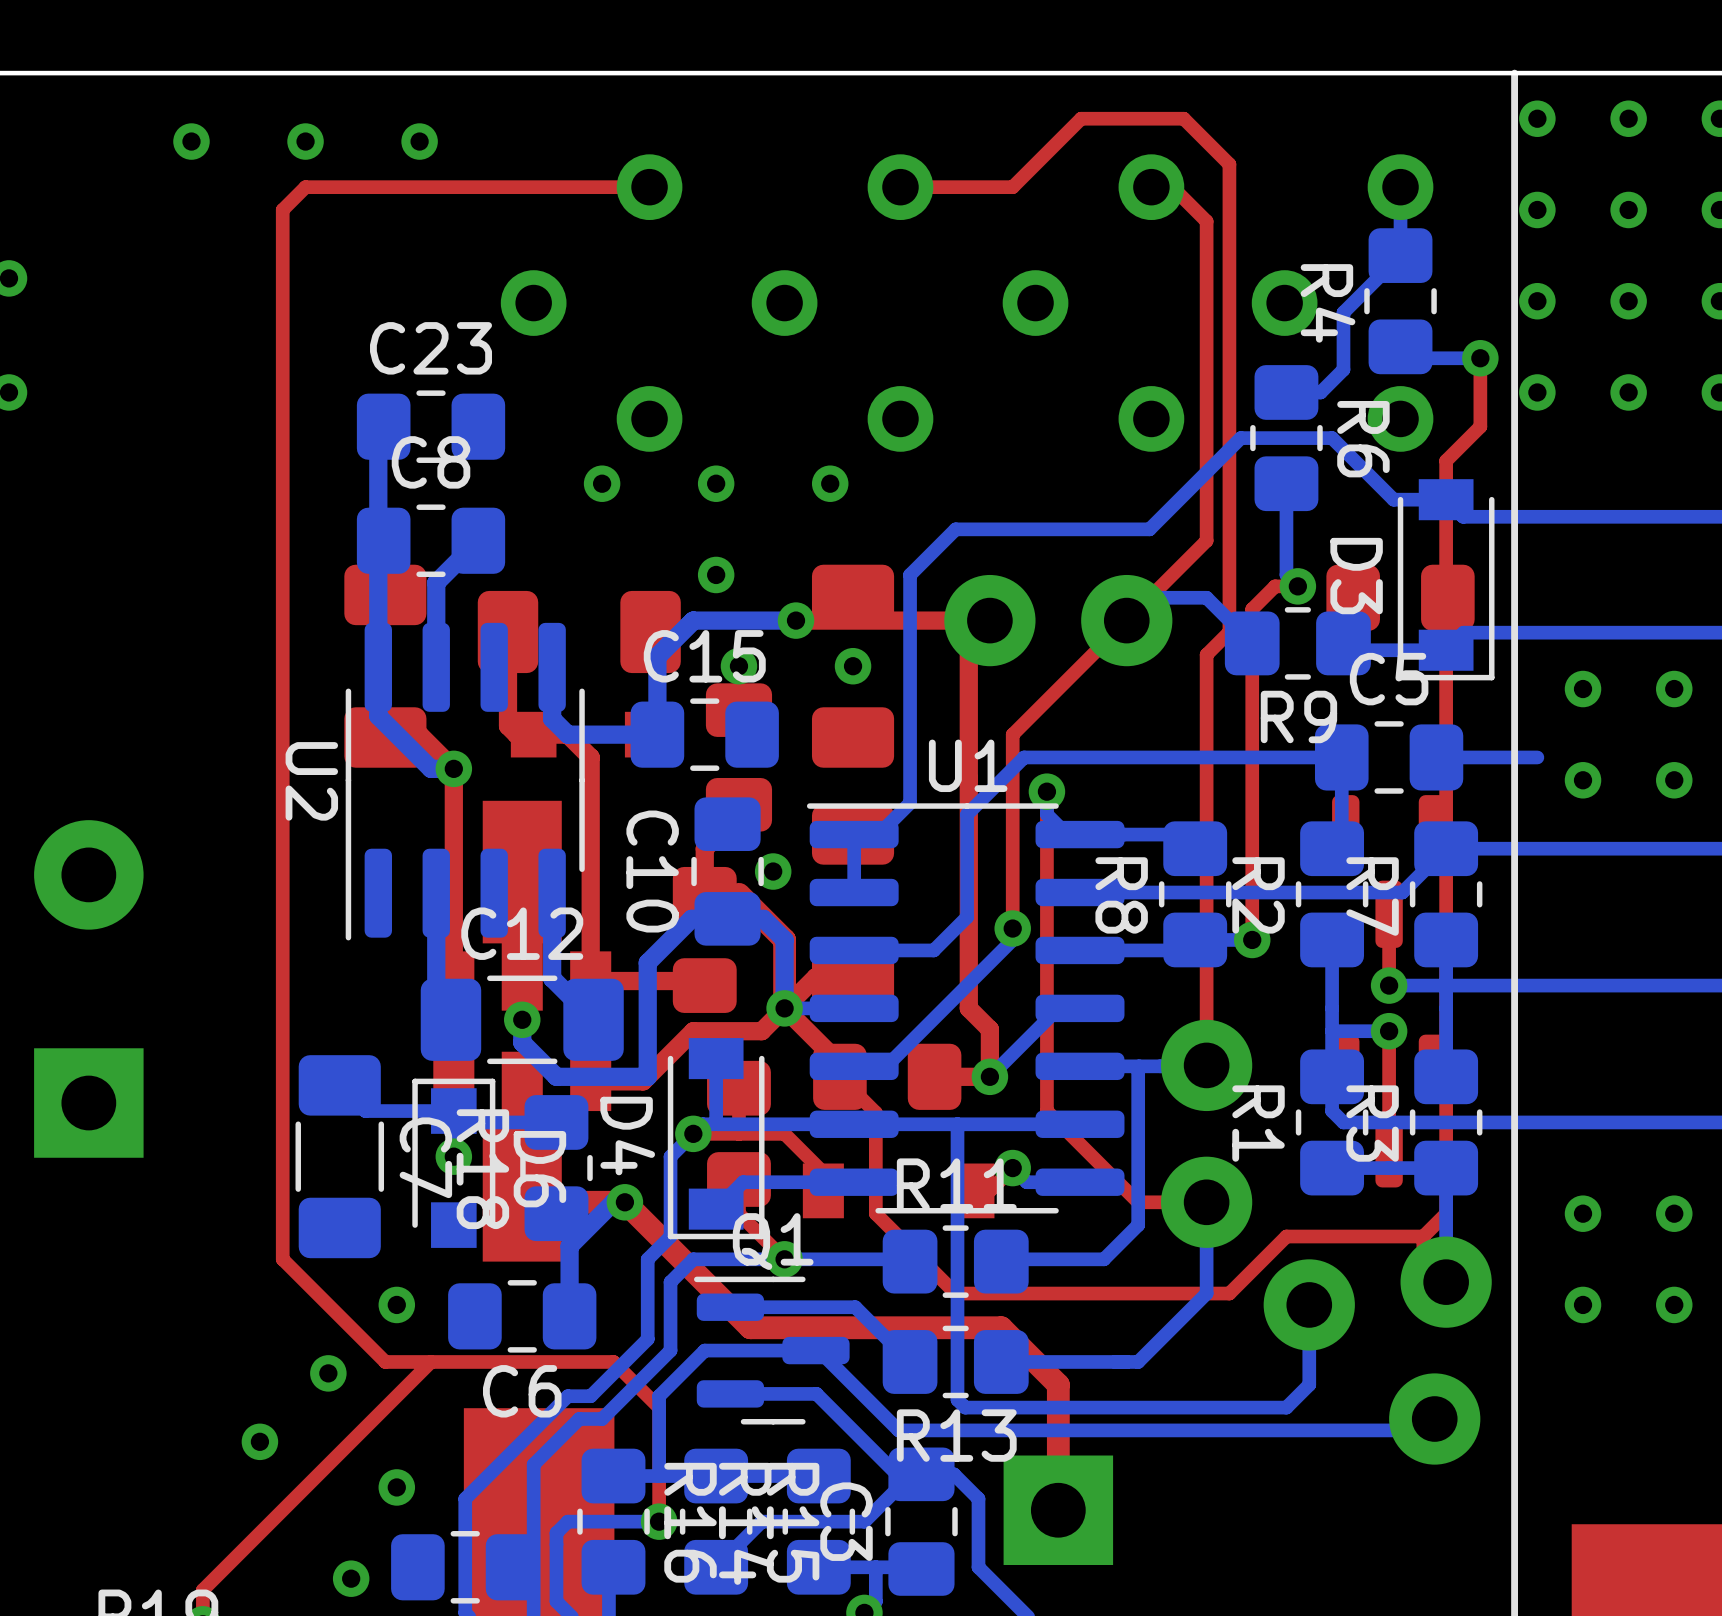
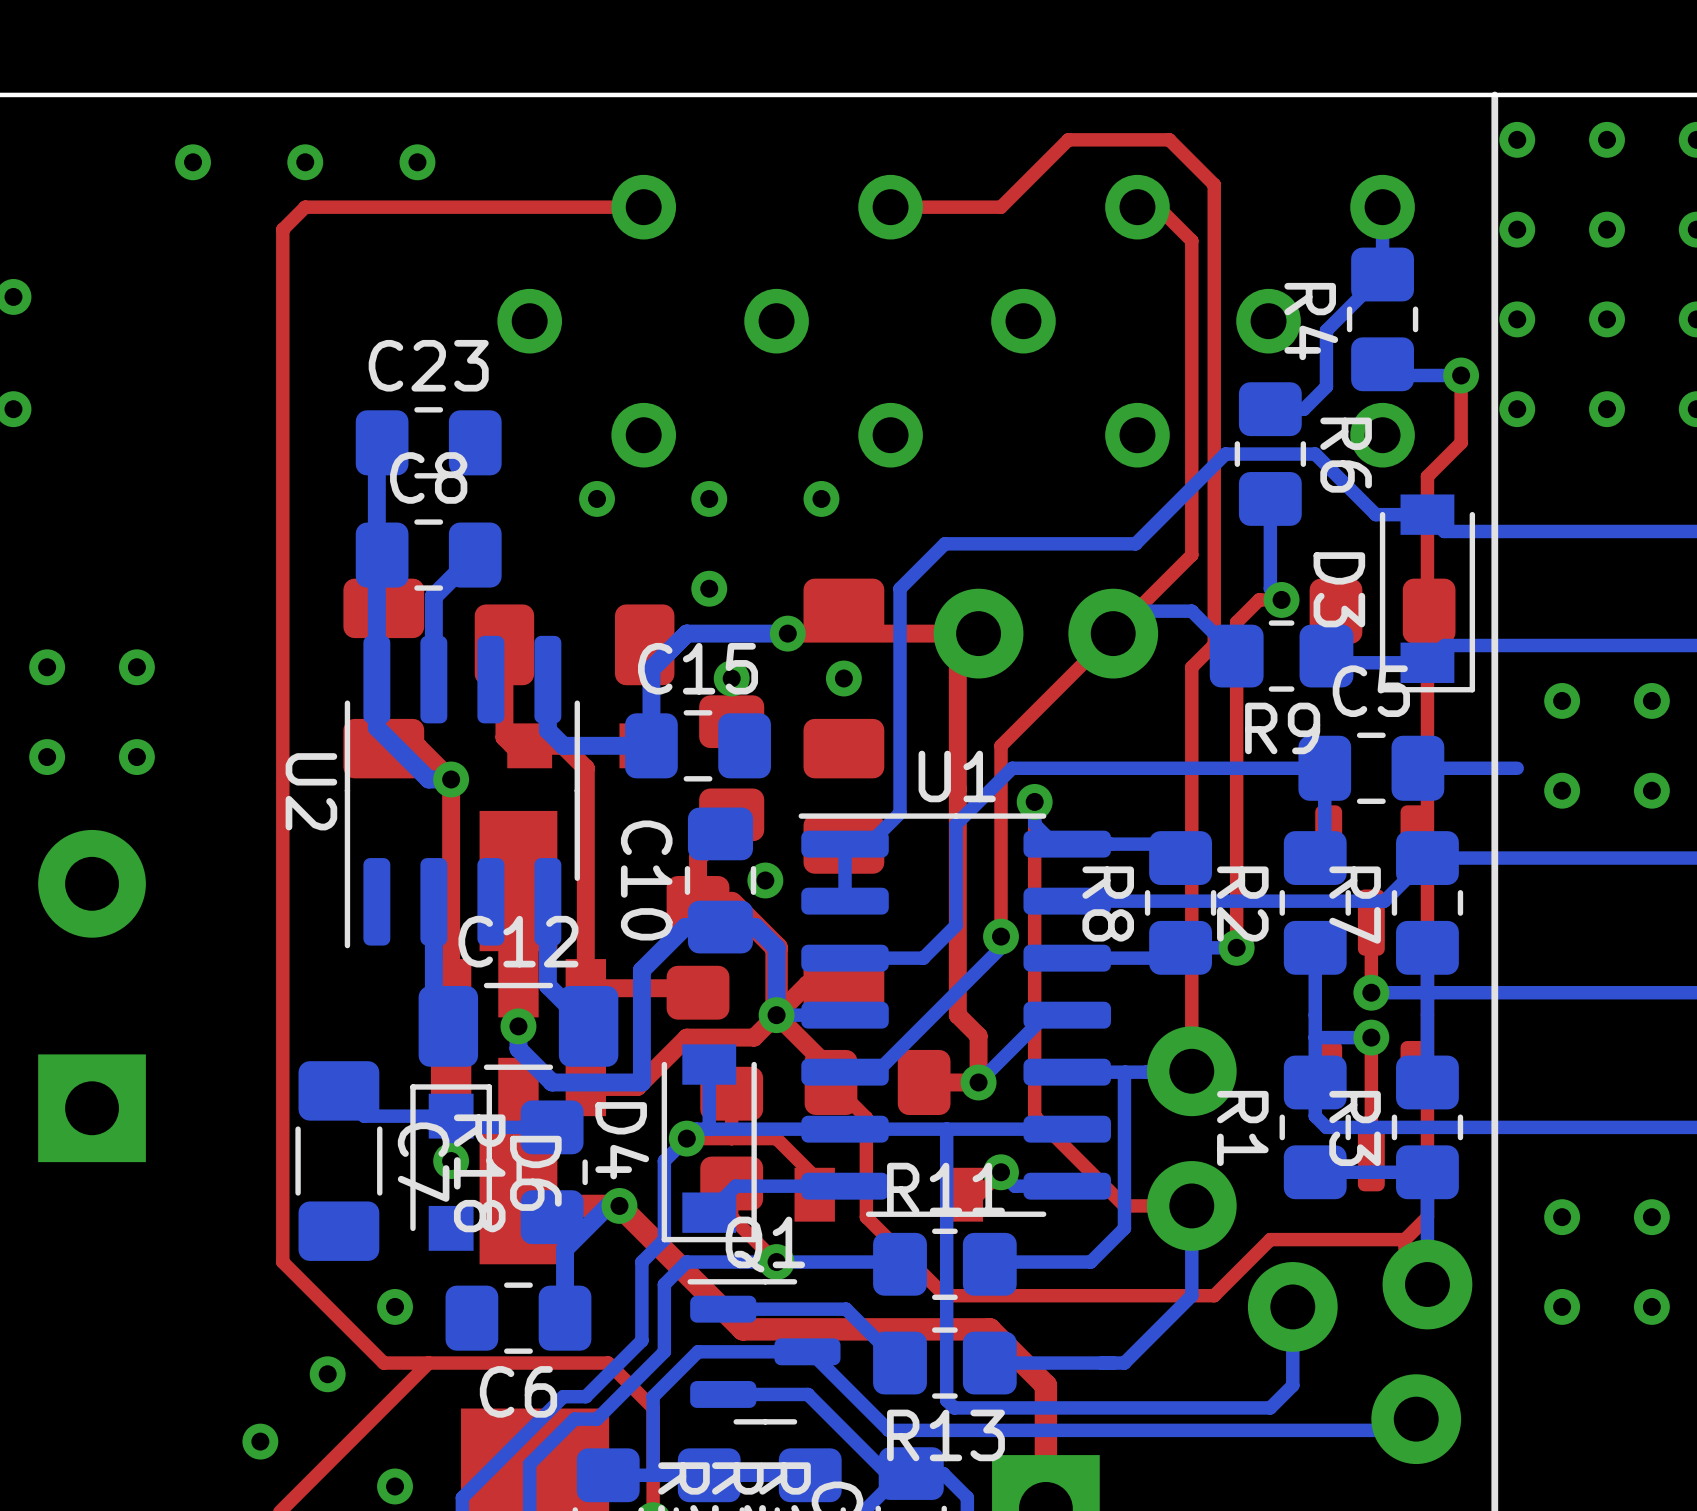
via: none -> (47, 667)
via: none -> (136, 667)
via: none -> (47, 757)
via: none -> (136, 757)

